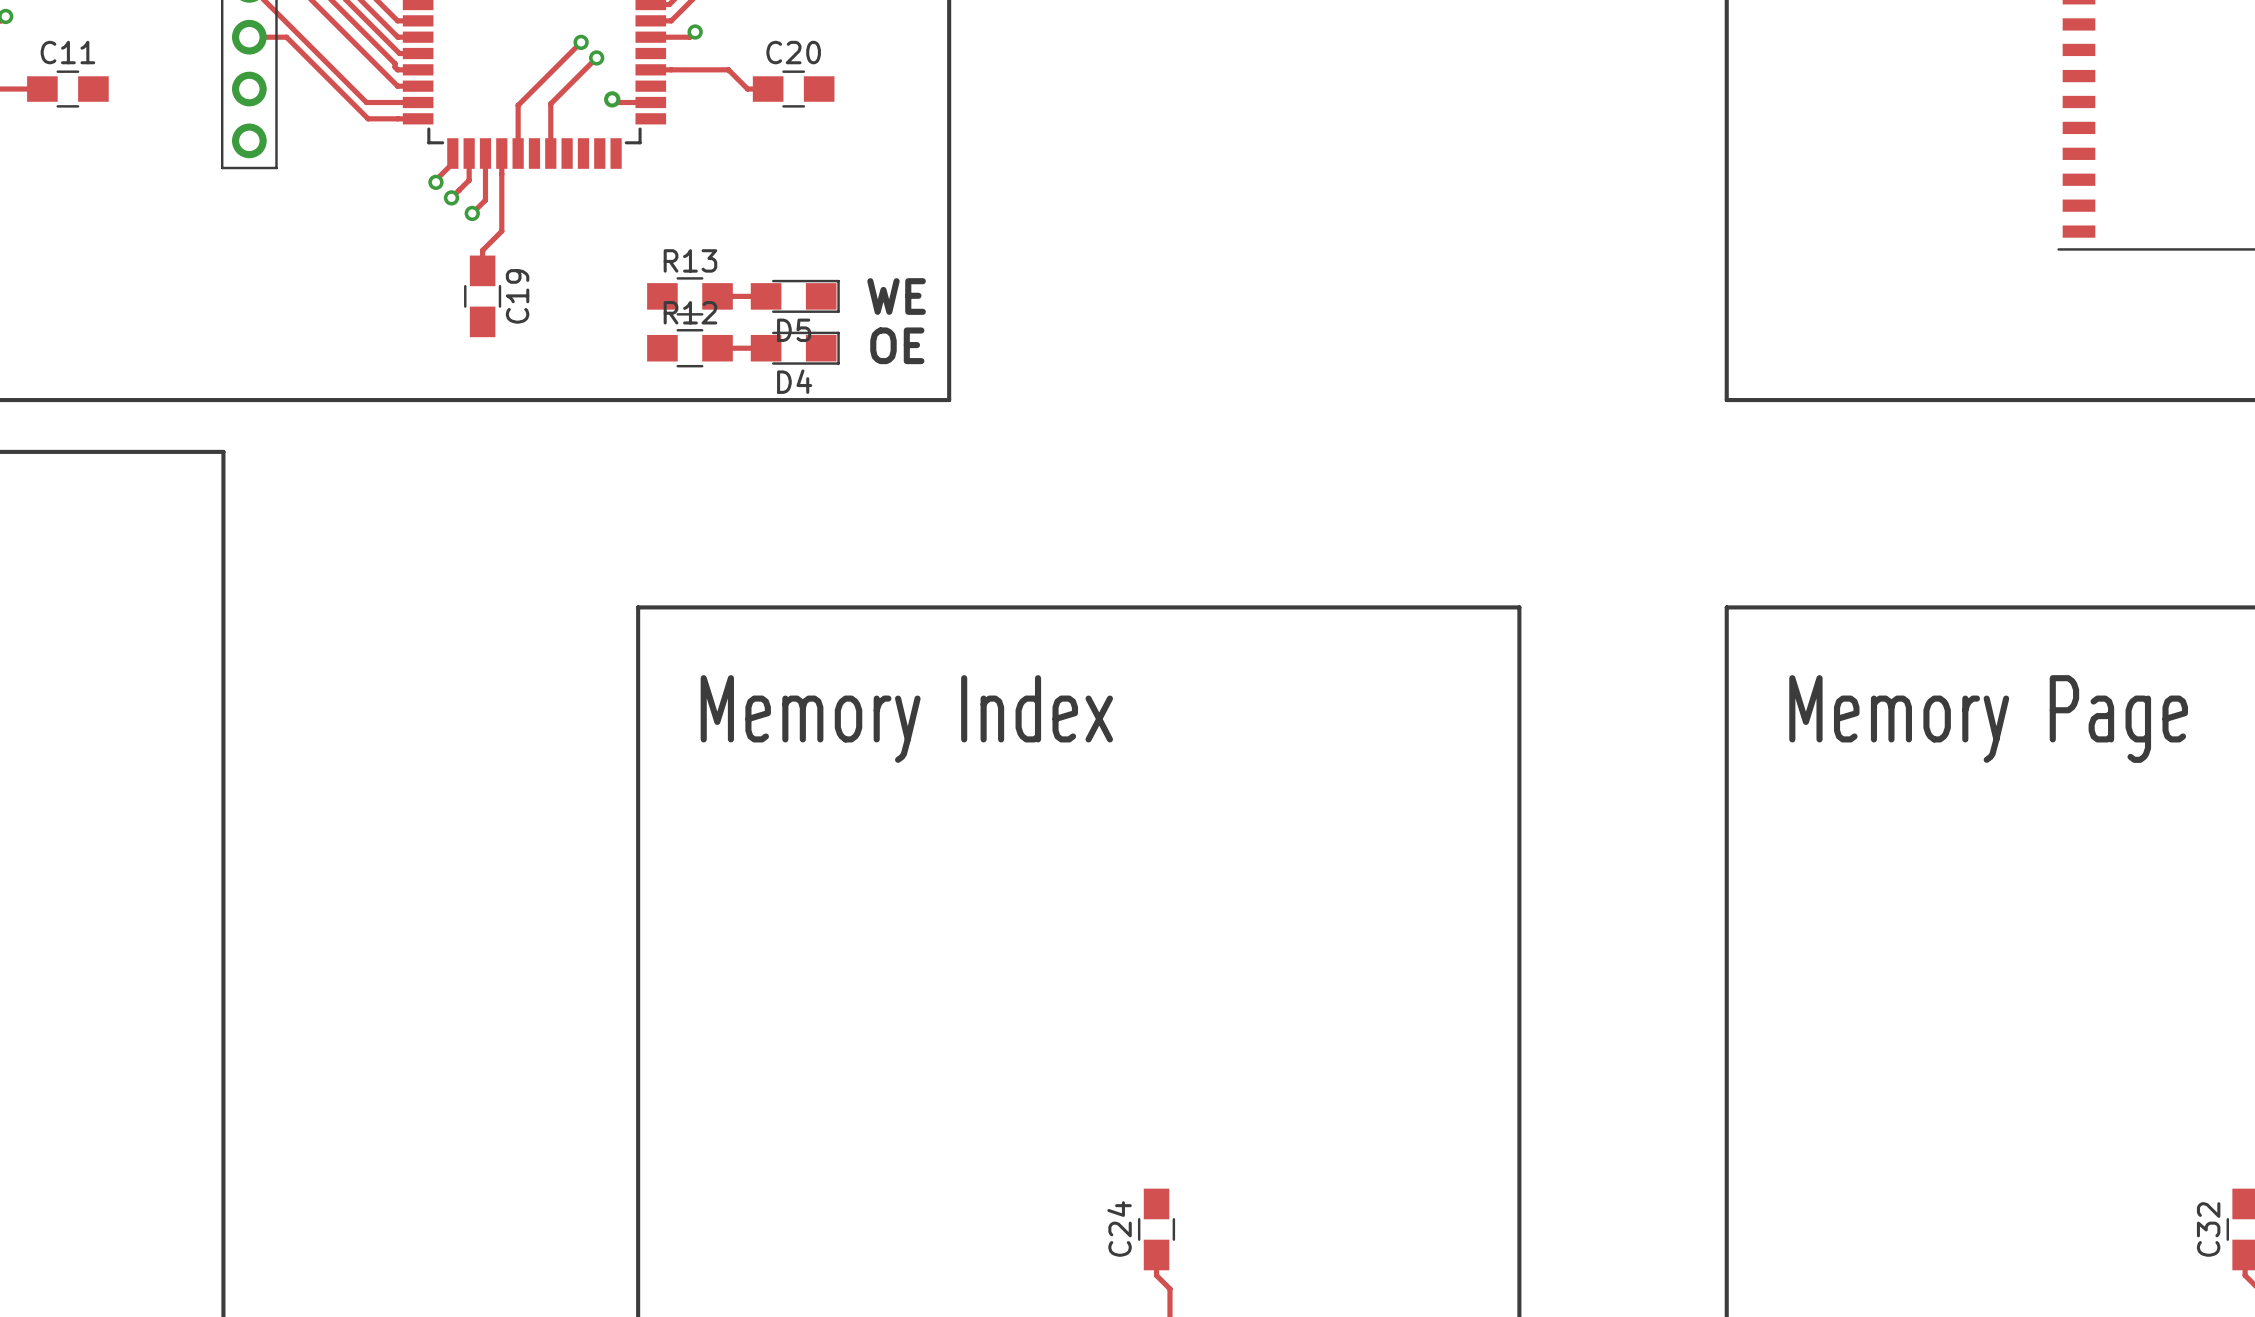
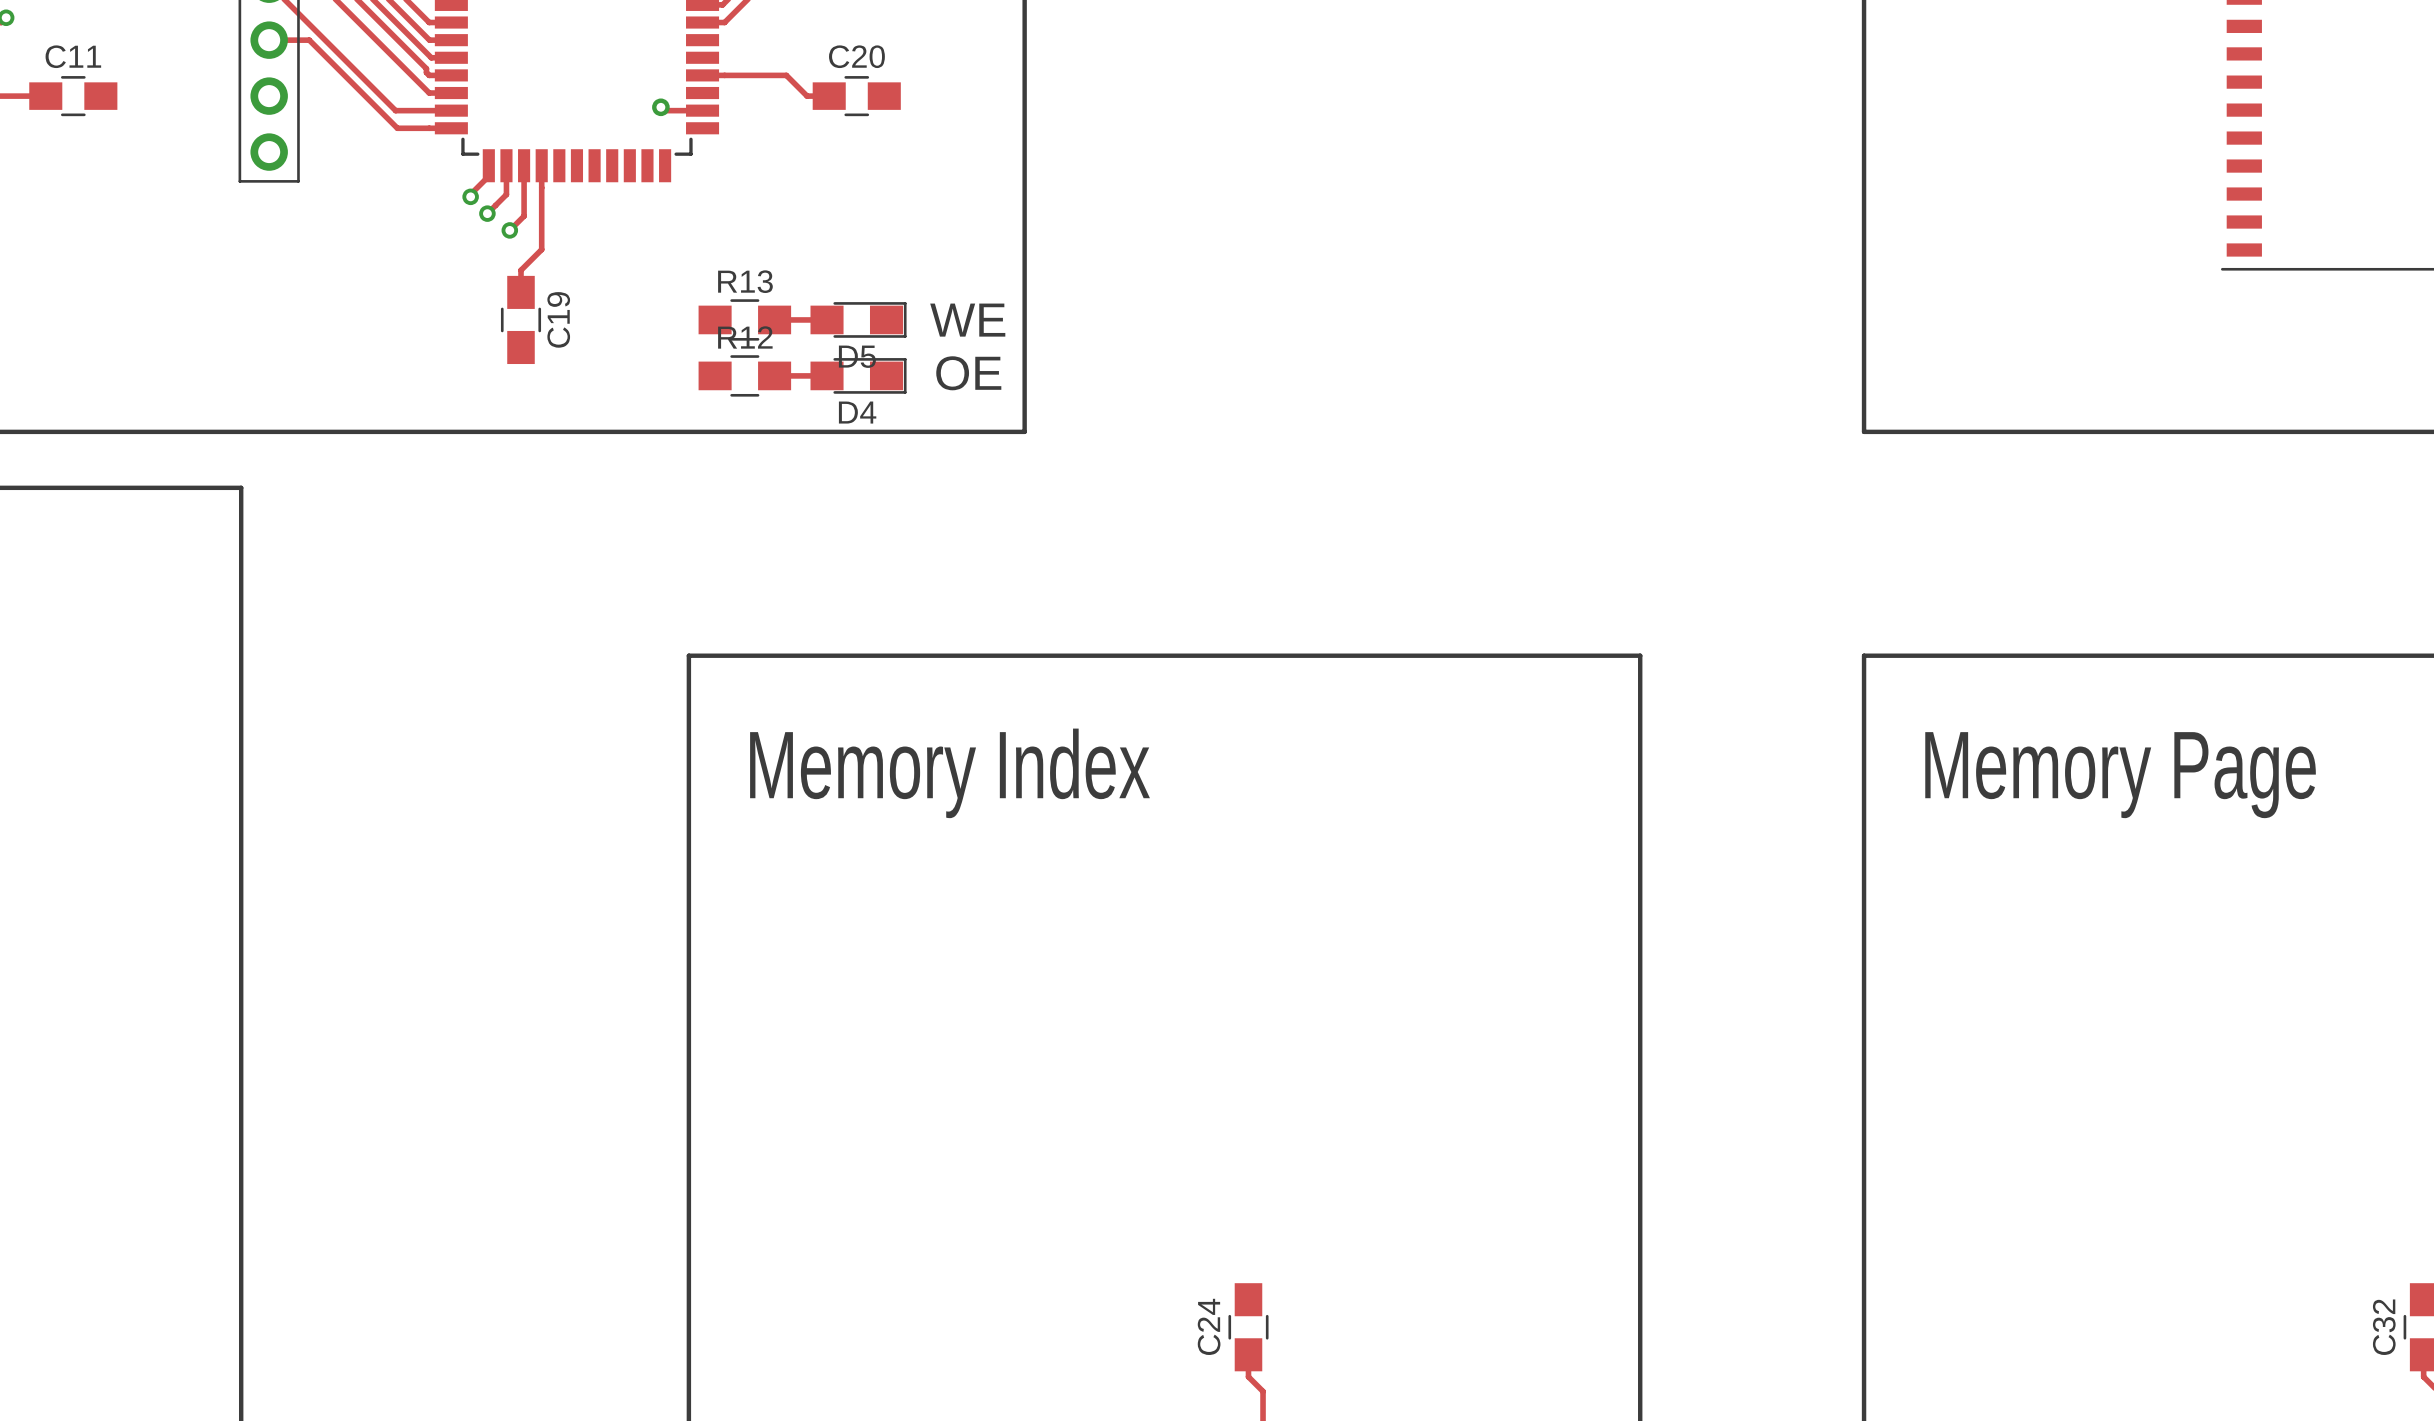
track: (695, 32) (689, 37) (650, 37) -> none
via: (695, 32) -> none
track: (581, 42) (518, 105) (518, 153) -> none
via: (581, 42) -> none
track: (596, 57) (550, 103) (550, 153) -> none
via: (596, 57) -> none

